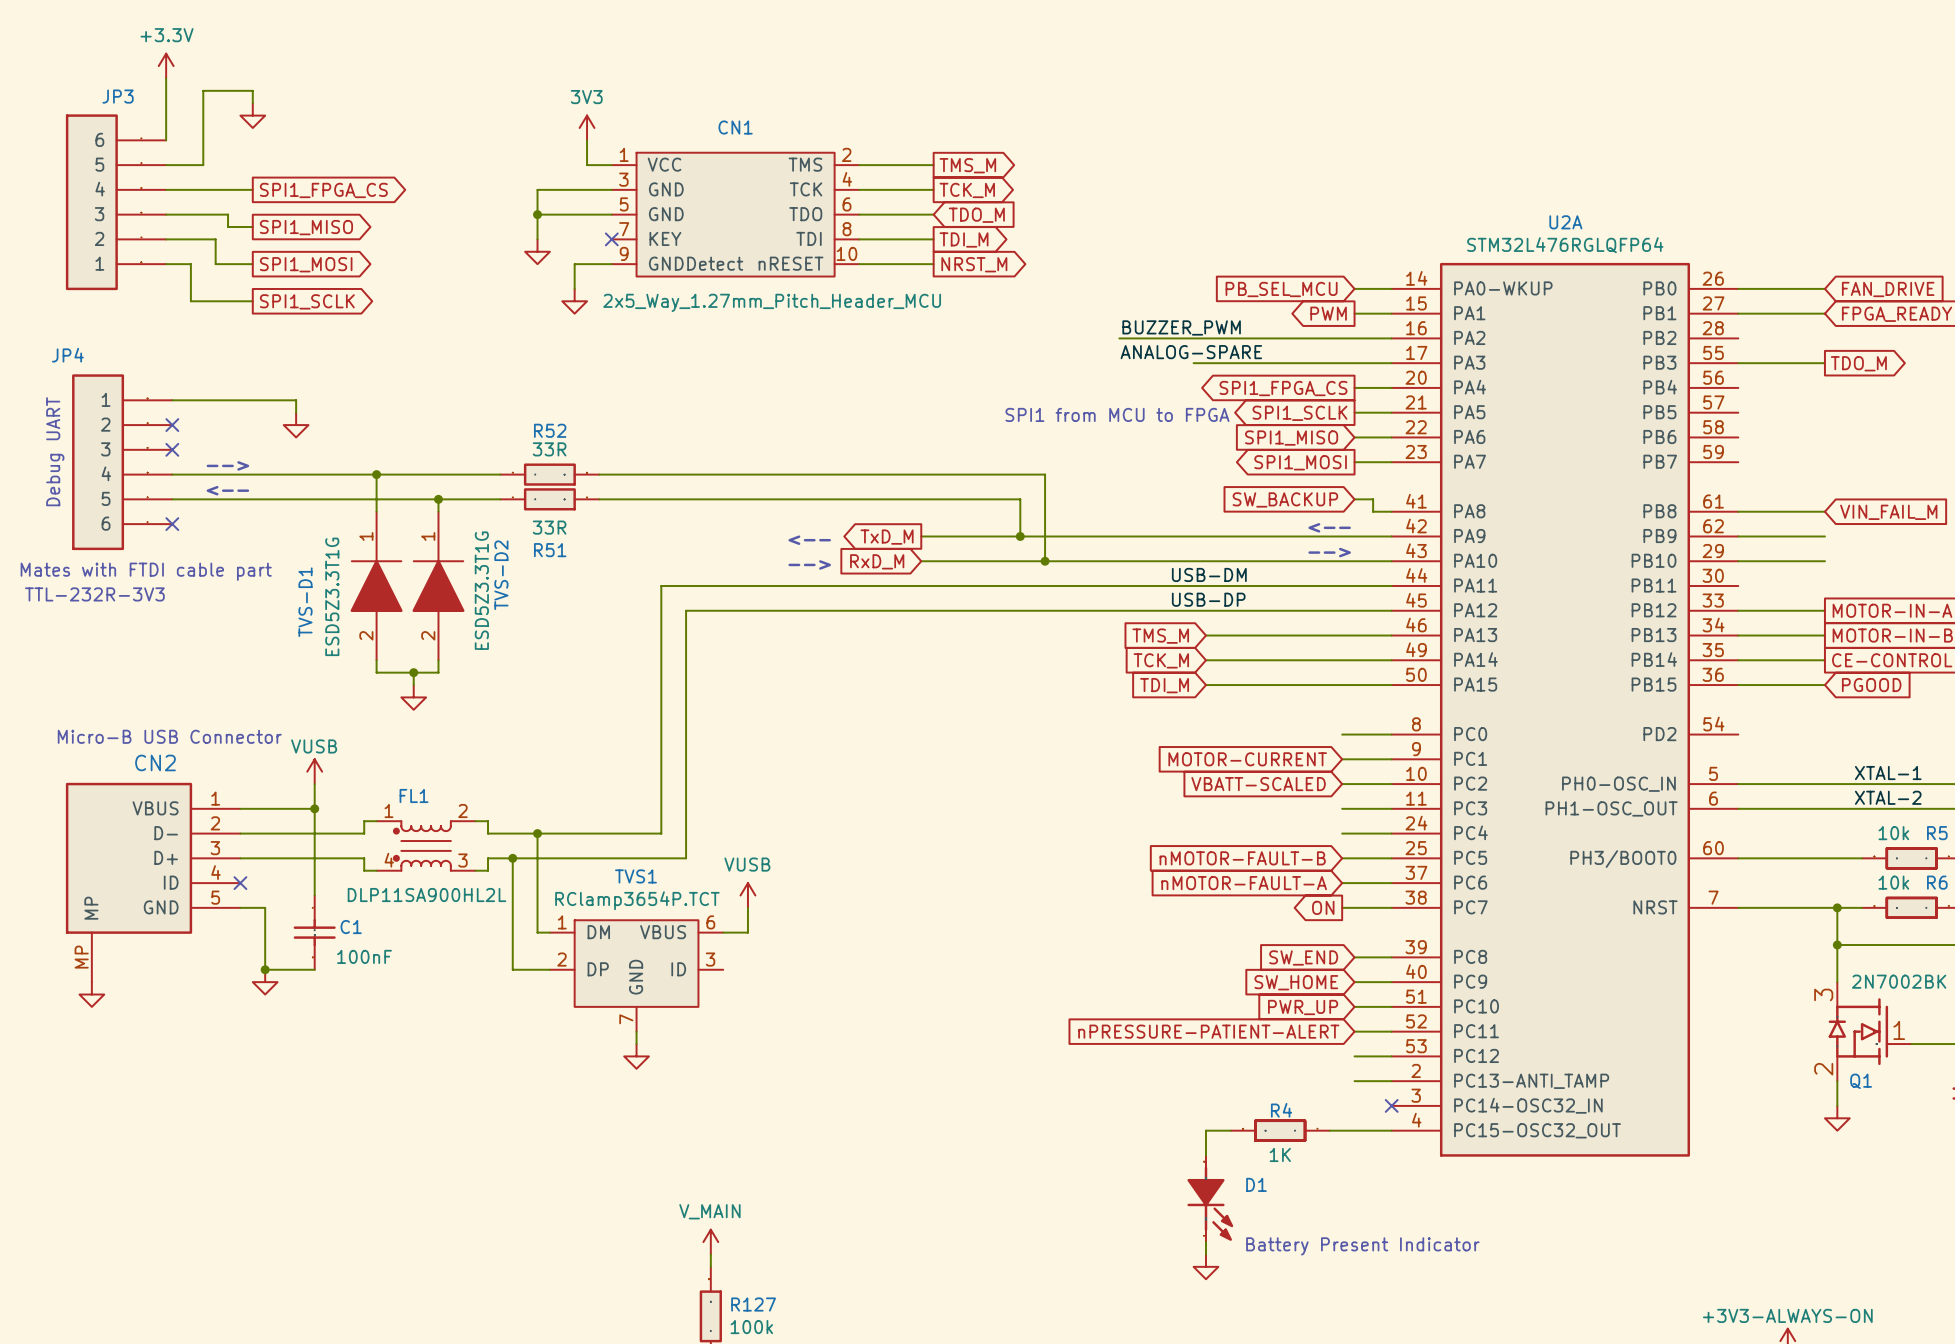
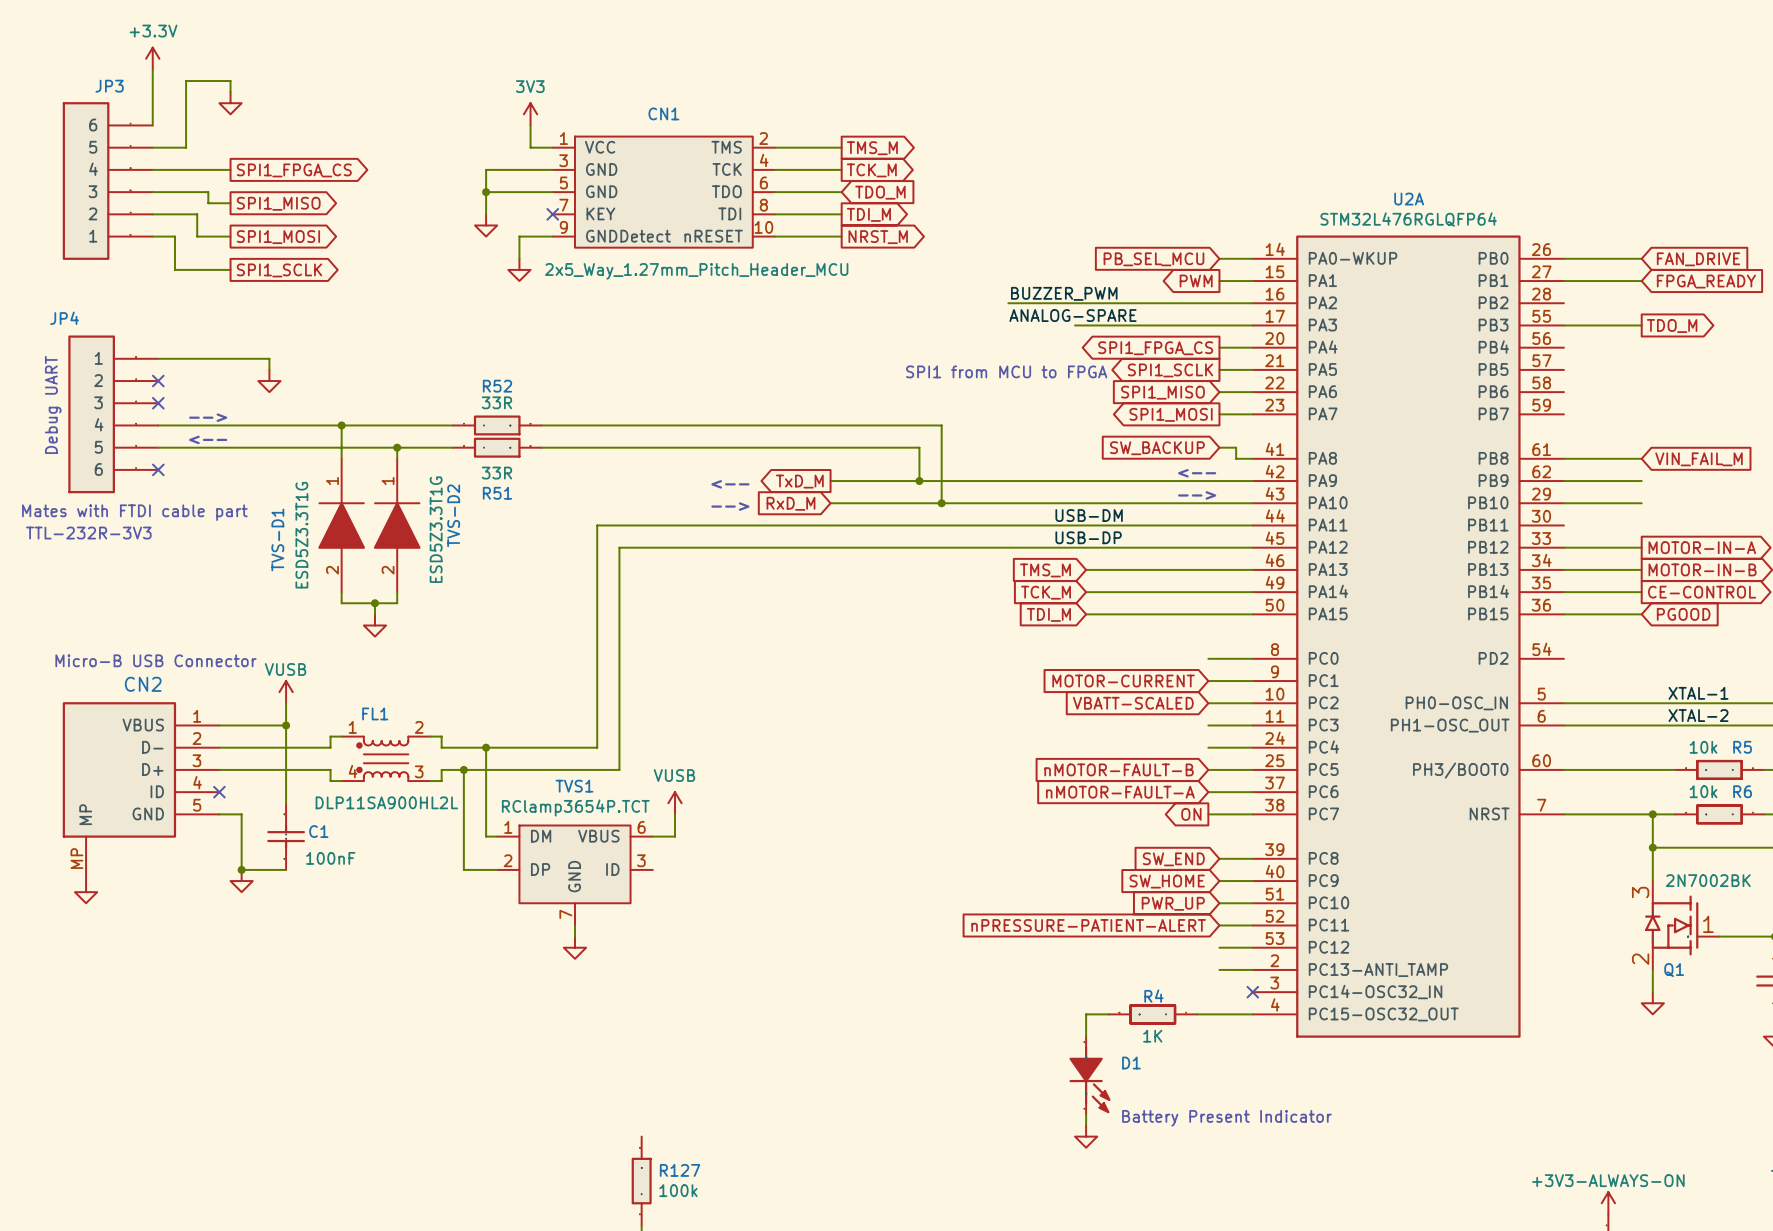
power symbol: V_MAIN (710, 1242) -> none
wire: (710, 1254) (710, 1266) -> none

